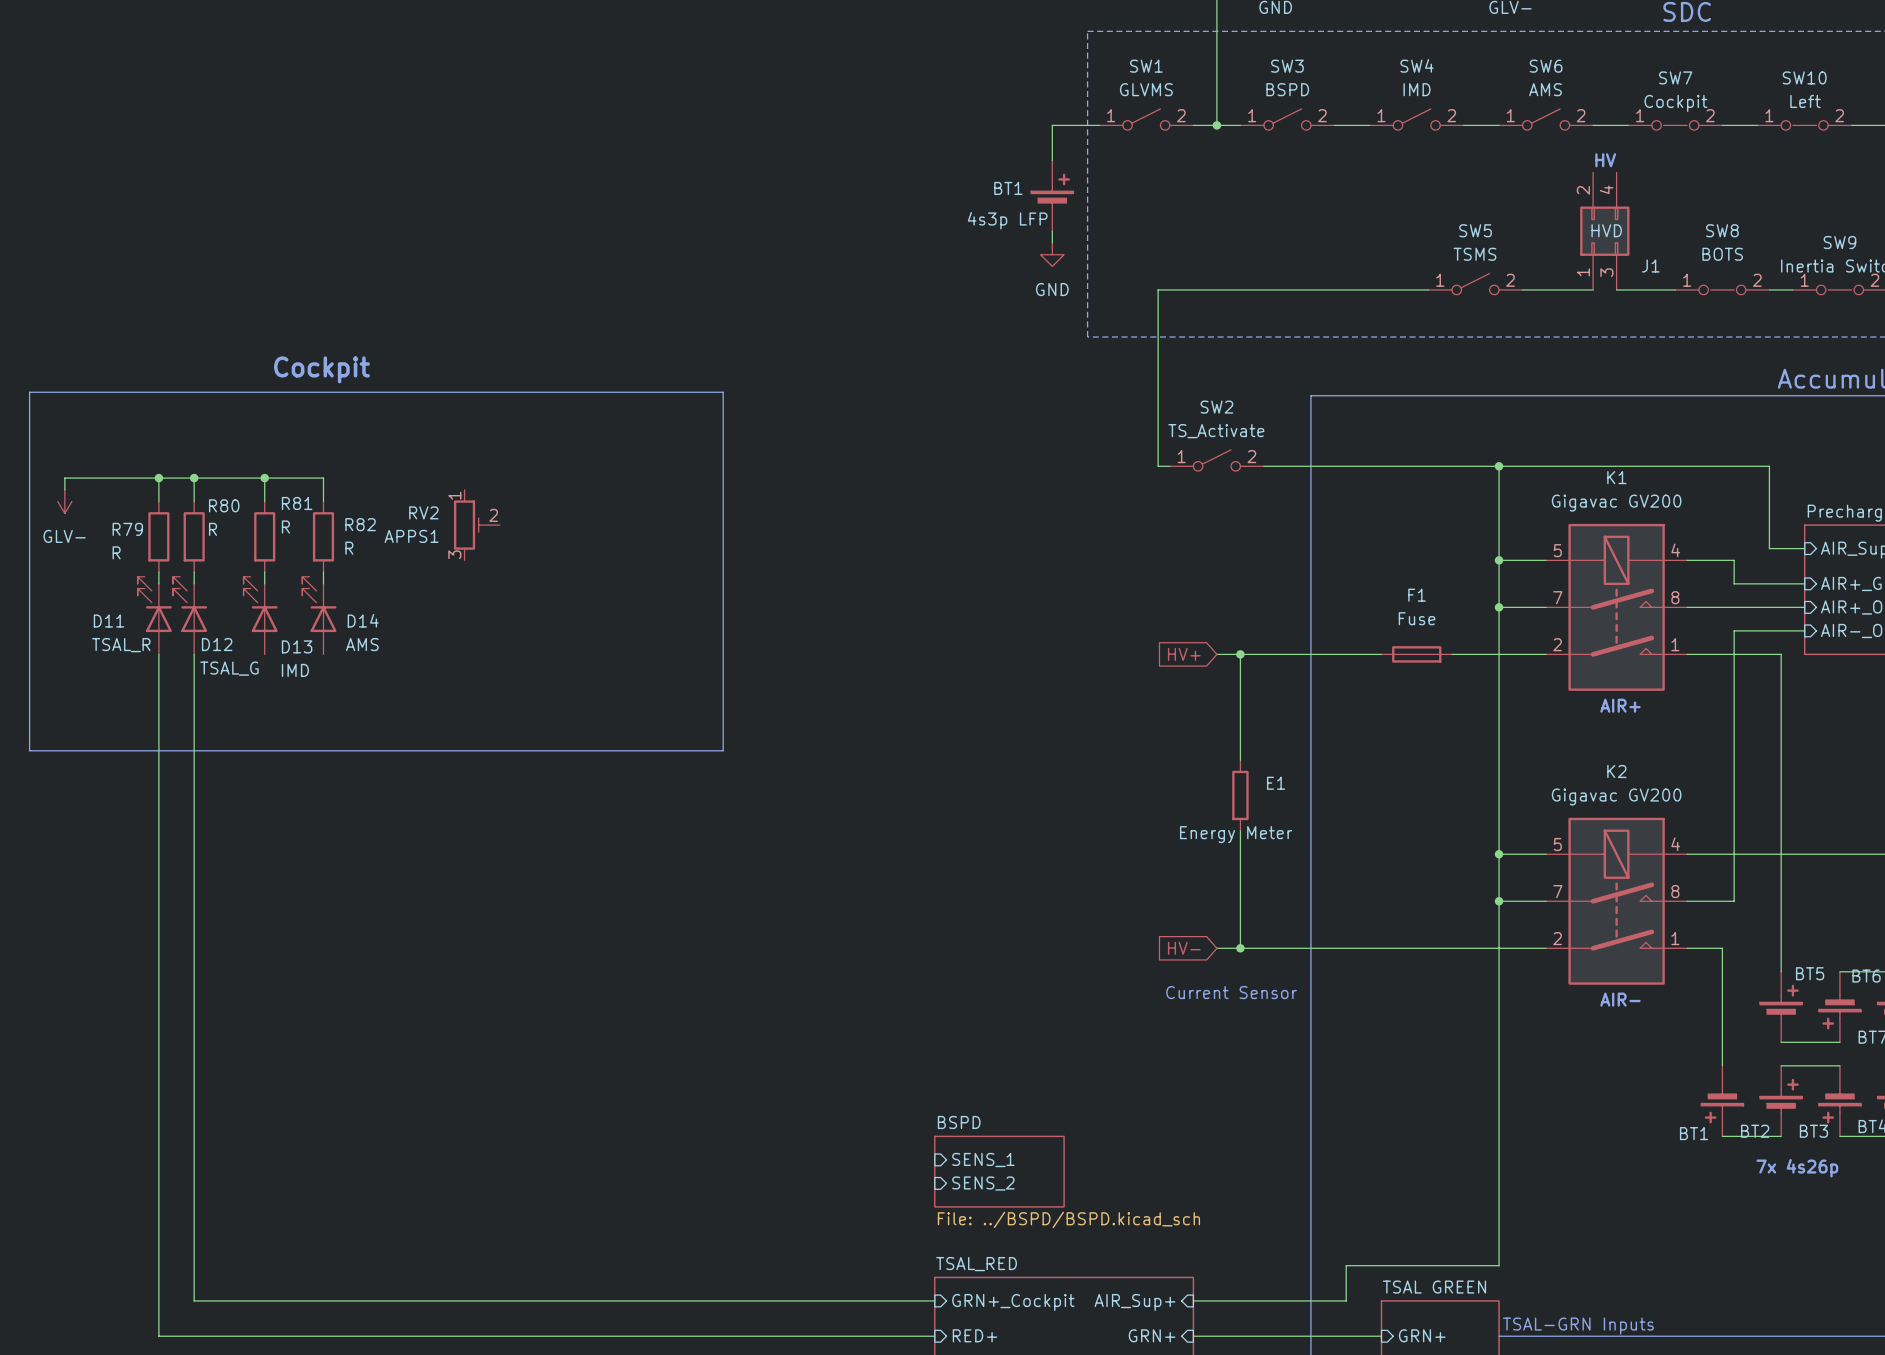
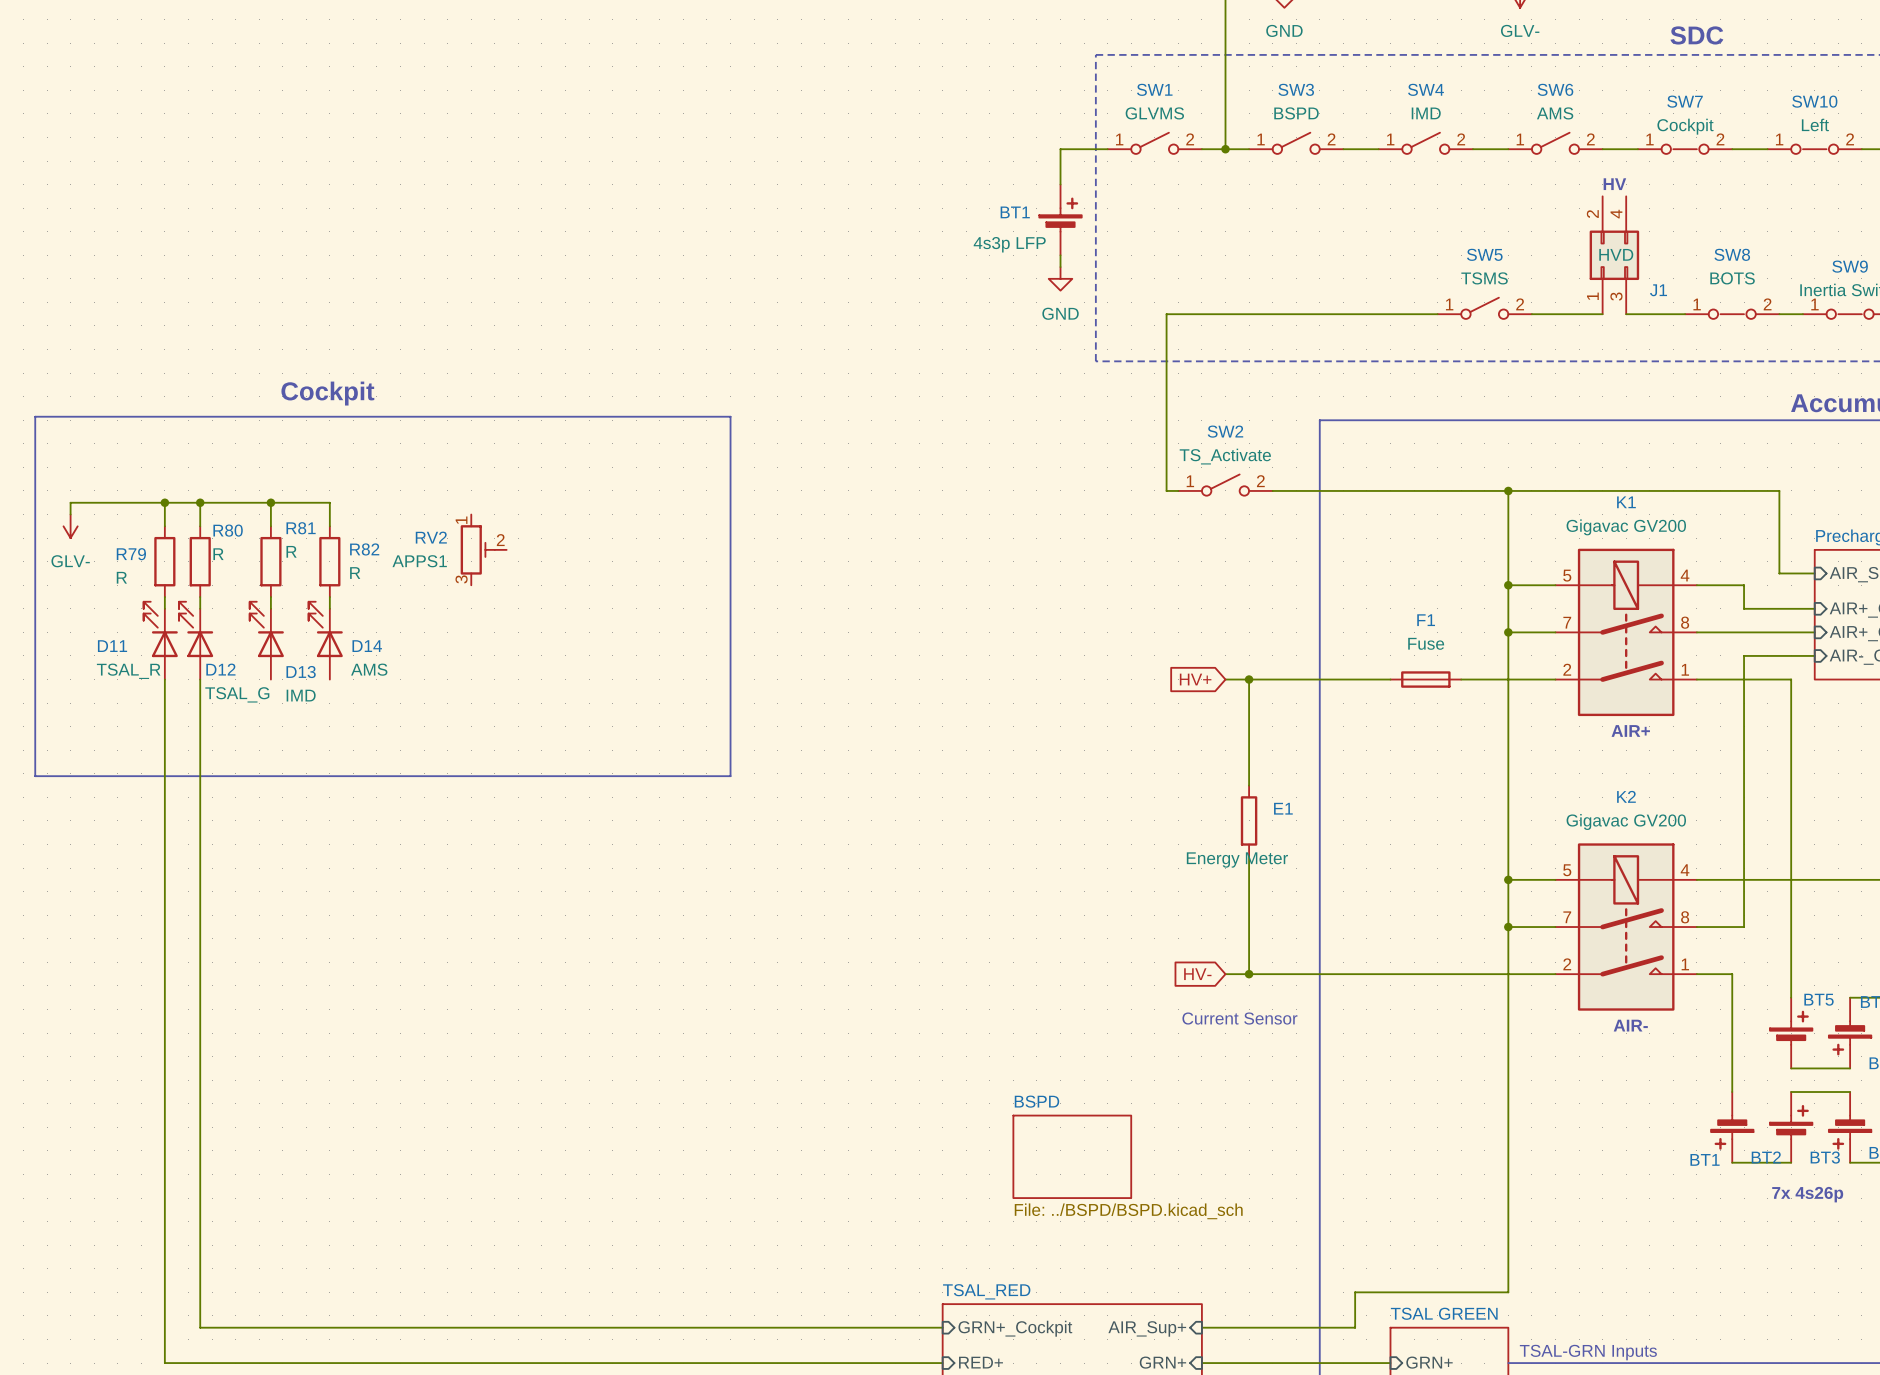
sheet BSPD: none -> File: ../BSPD/BSPD.kicad_sch (1072, 1156)
sheet pin: SENS_1 (983, 1160) -> none
sheet BSPD: File: ../BSPD/BSPD.kicad_sch (999, 1171) -> none
sheet pin: SENS_2 (983, 1183) -> none

